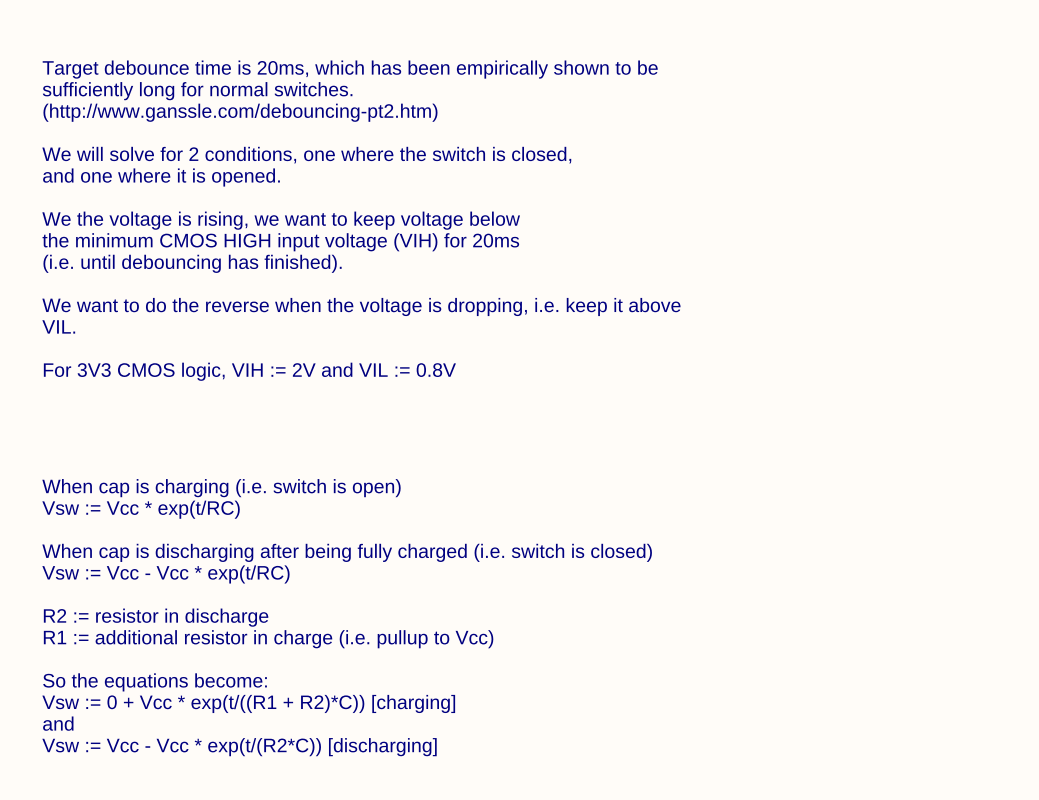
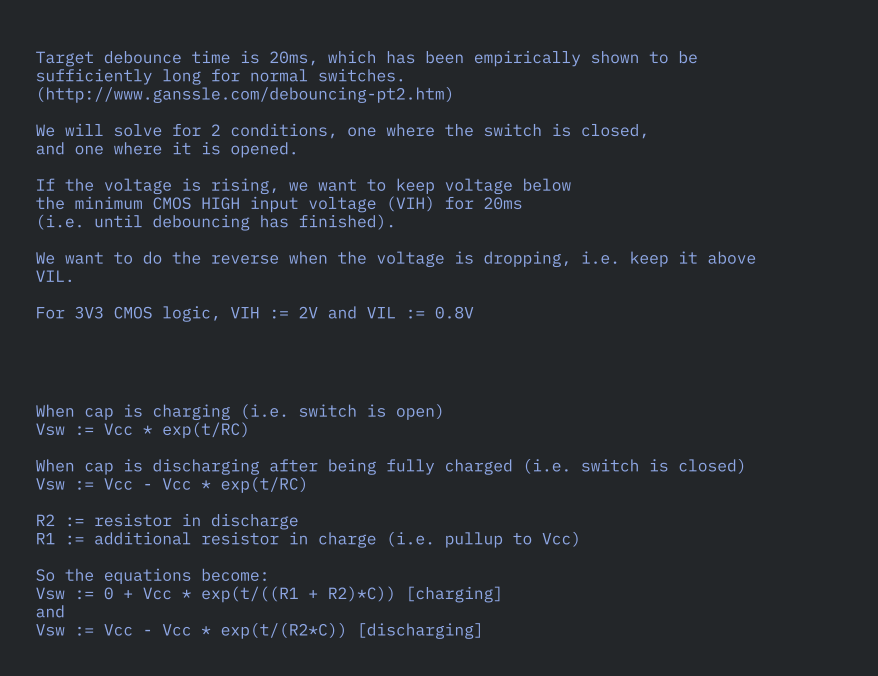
text: We the voltage is rising, we want to keep voltage below (281, 220) -> If the voltage is rising, we want to keep voltage below (303, 186)

